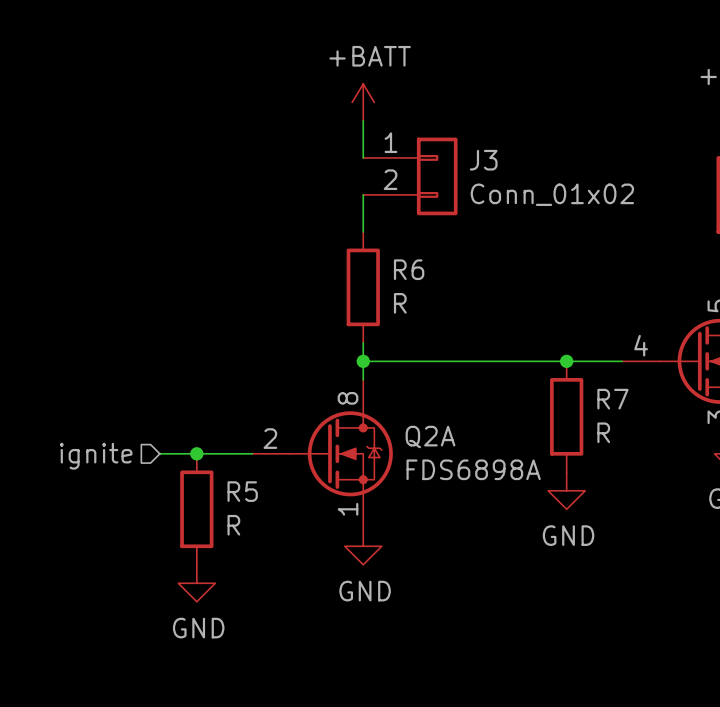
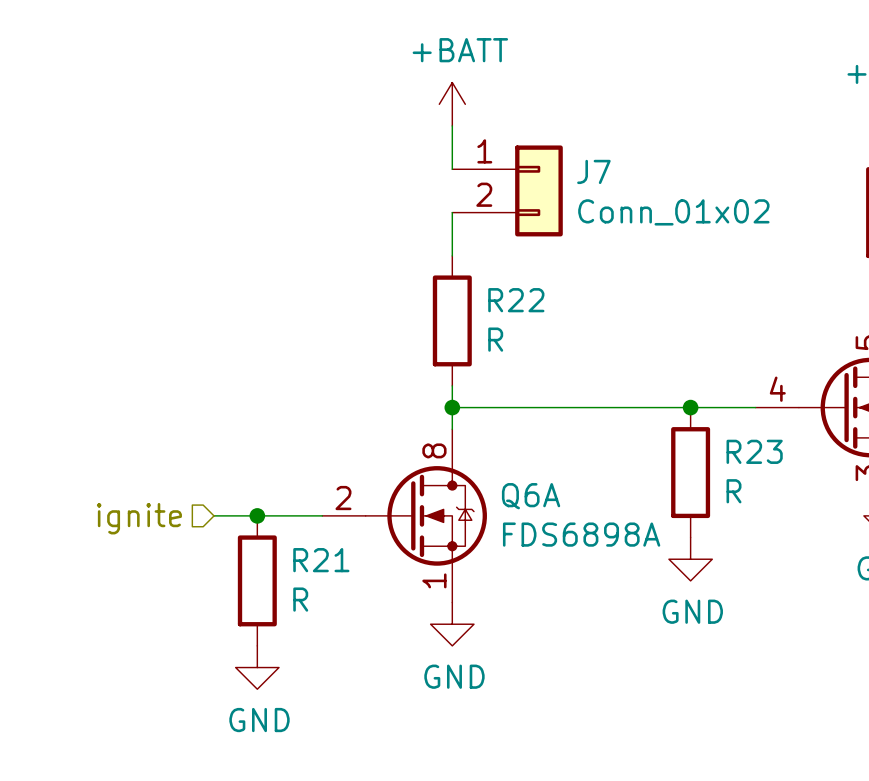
J3 name: J3 (483, 160) -> J7 (593, 171)
R6 name: R6 (409, 269) -> R22 (516, 300)
R7 name: R7 (612, 399) -> R23 (754, 451)
Q2A name: Q2A (430, 437) -> Q6A (531, 496)
R5 name: R5 (242, 491) -> R21 (321, 560)

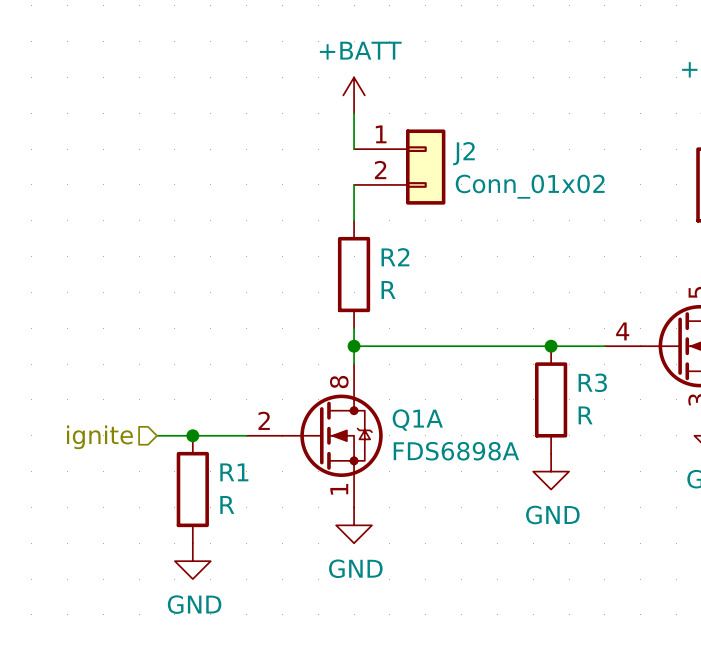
J7 name: J7 (593, 171) -> J2 (463, 153)
R22 name: R22 (516, 300) -> R2 (395, 257)
R23 name: R23 (754, 451) -> R3 (592, 382)
Q6A name: Q6A (531, 496) -> Q1A (417, 420)
R21 name: R21 (321, 560) -> R1 (234, 472)

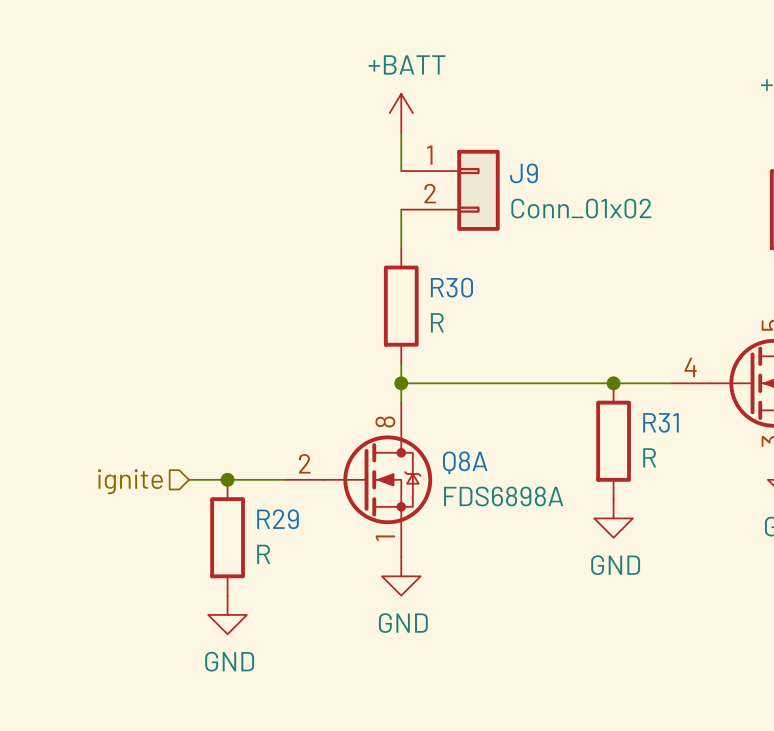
J2 name: J2 (463, 153) -> J9 (523, 173)
R2 name: R2 (395, 257) -> R30 (451, 287)
R3 name: R3 (592, 382) -> R31 (660, 422)
Q1A name: Q1A (417, 420) -> Q8A (465, 462)
R1 name: R1 (234, 472) -> R29 (278, 519)

